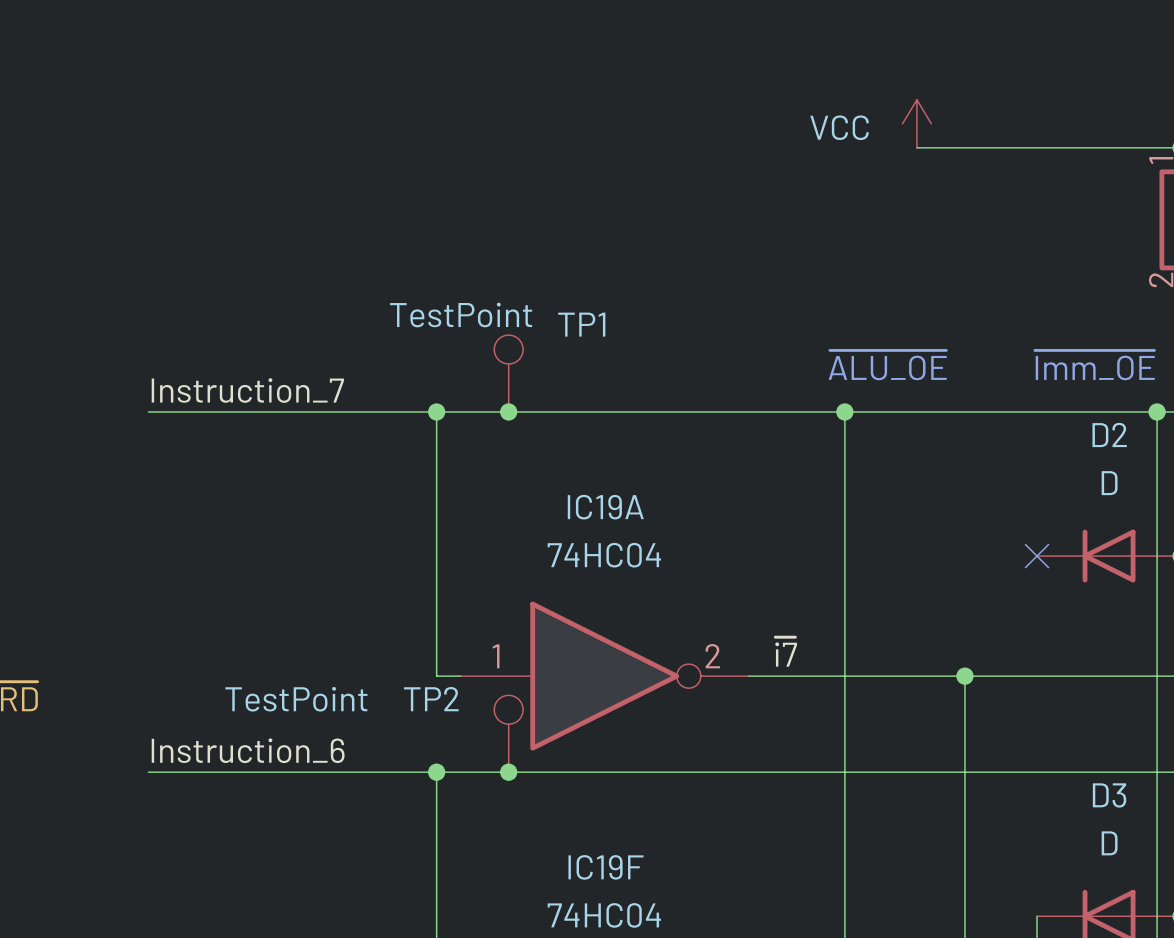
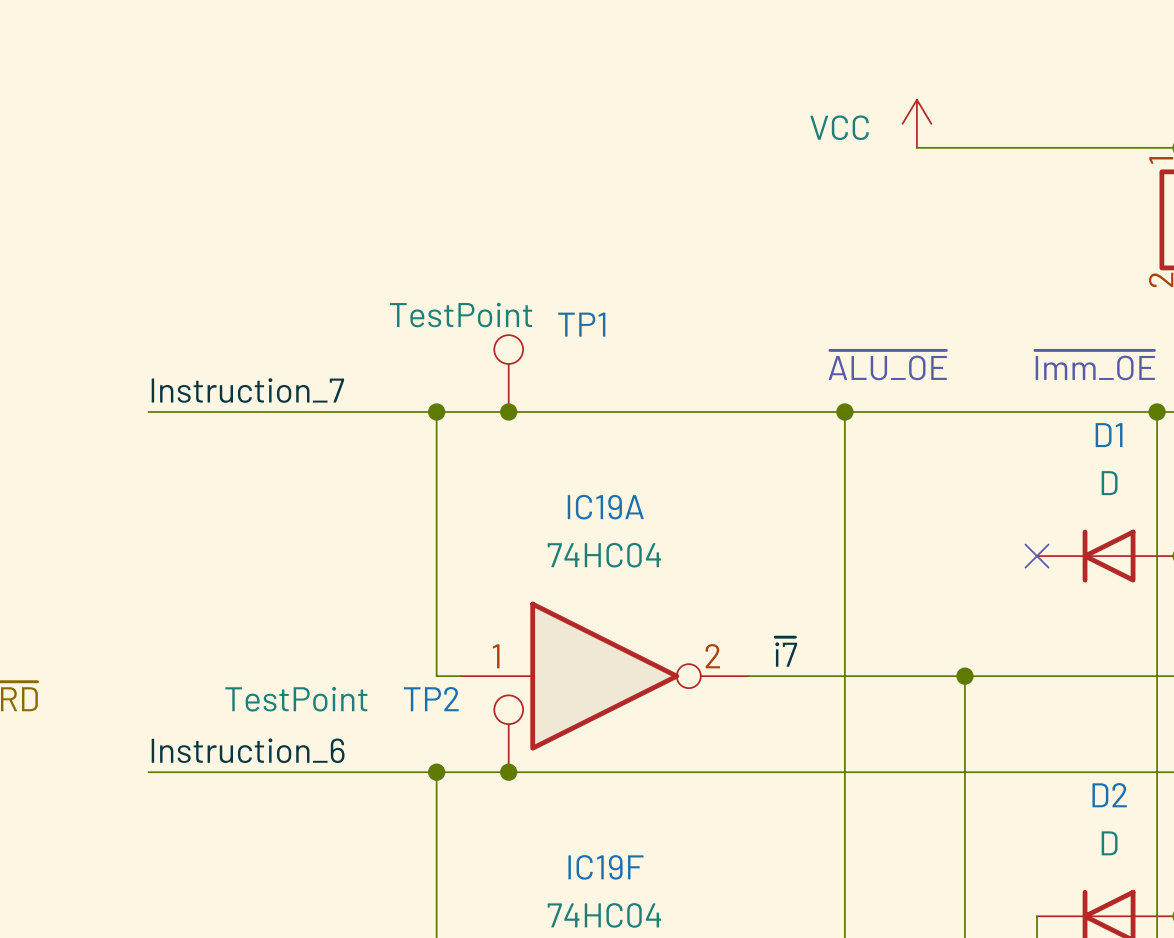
D2 name: D2 (1109, 434) -> D1 (1109, 435)
D3 name: D3 (1109, 795) -> D2 (1109, 795)

